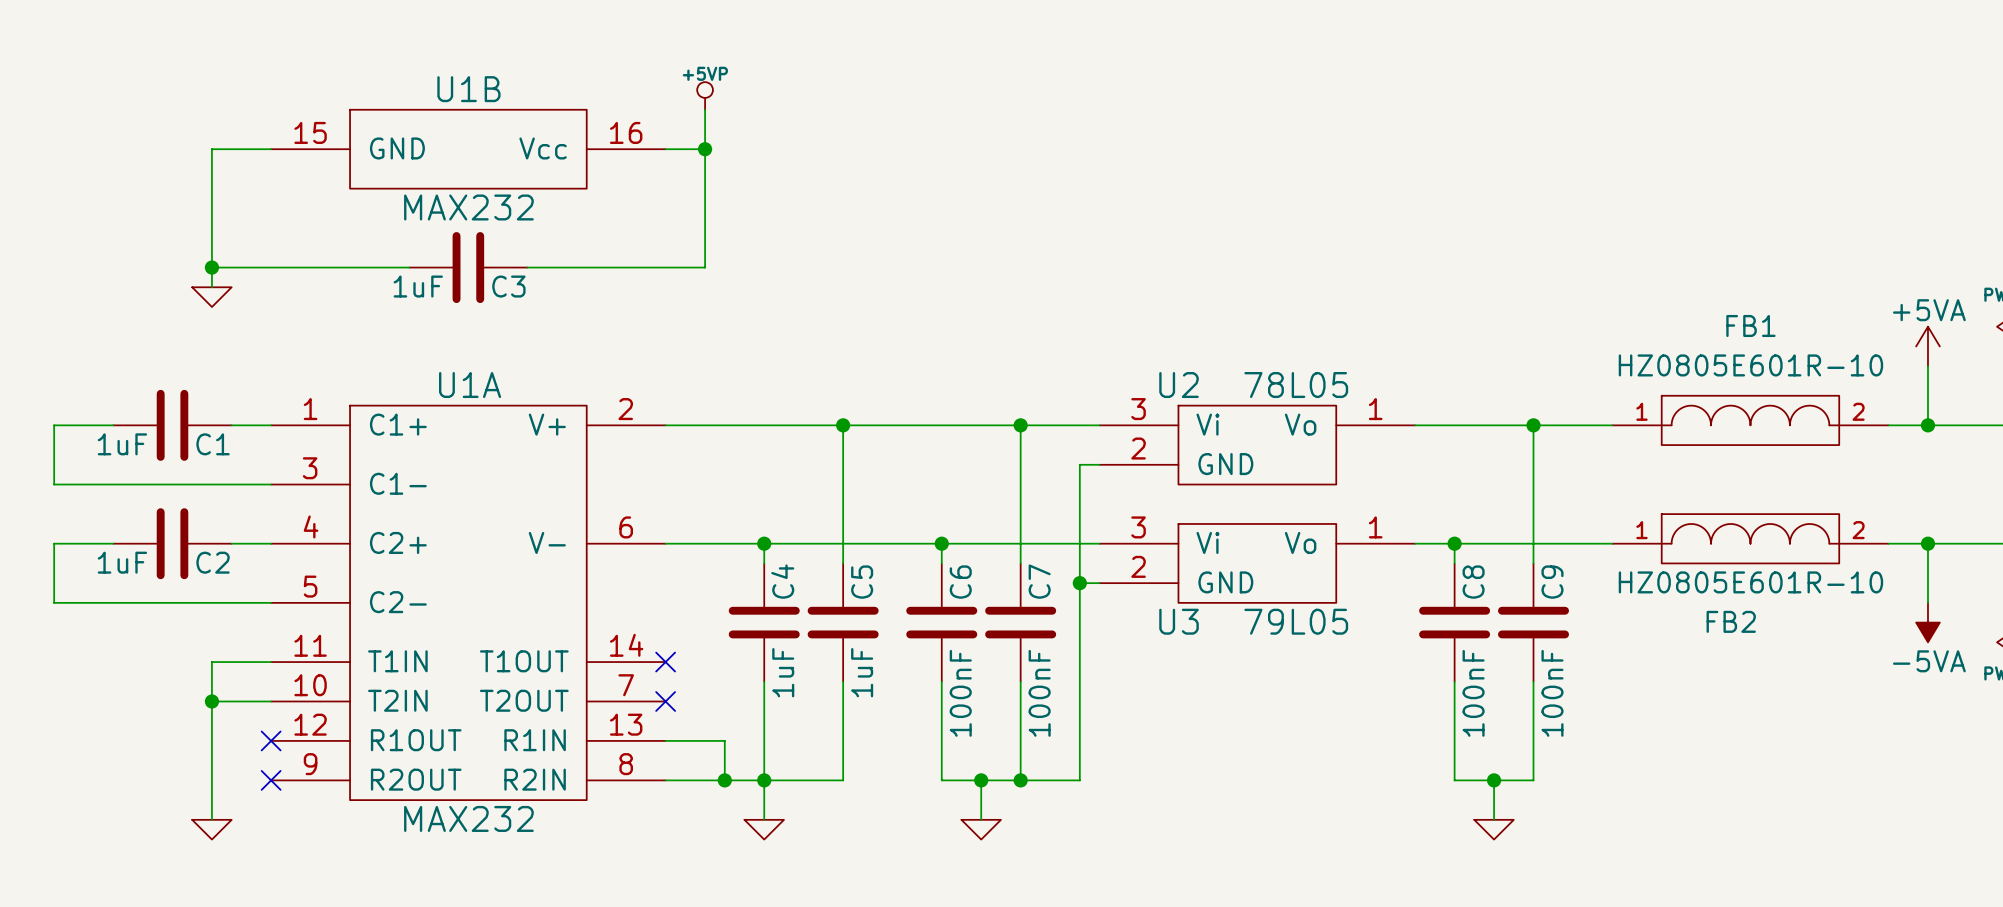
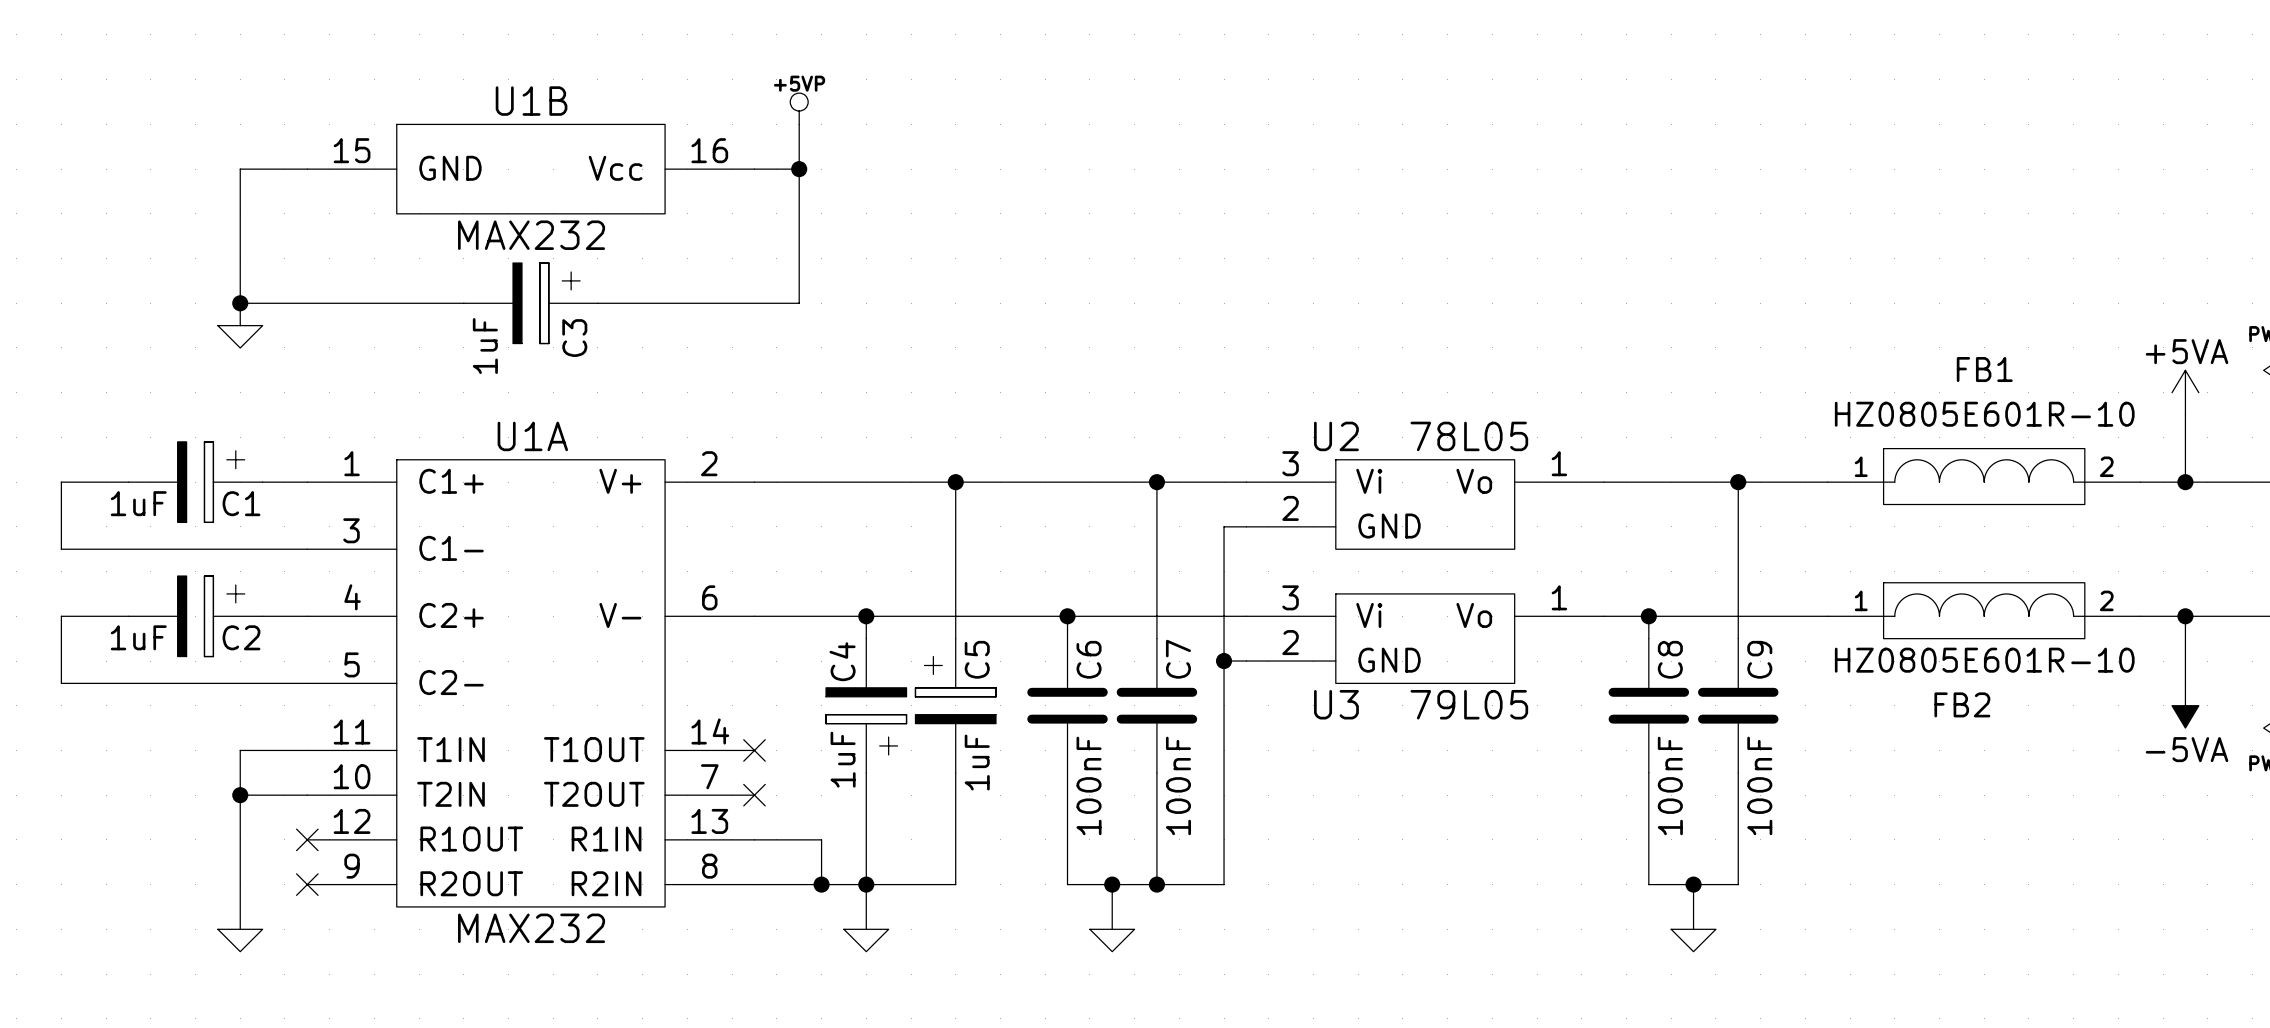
C3 symbol: [409, 232, 528, 304] -> [463, 263, 598, 344]
C1 symbol: [113, 389, 232, 461] -> [128, 441, 263, 523]
C2 symbol: [113, 508, 232, 580] -> [128, 576, 263, 657]
C4 symbol: [728, 563, 800, 682] -> [826, 638, 907, 773]
C5 symbol: [807, 563, 879, 682] -> [915, 638, 996, 773]
C4 name position: C4 (782, 581) -> C4 (842, 661)
C4 value position: 1uF (783, 672) -> 1uF (843, 759)

